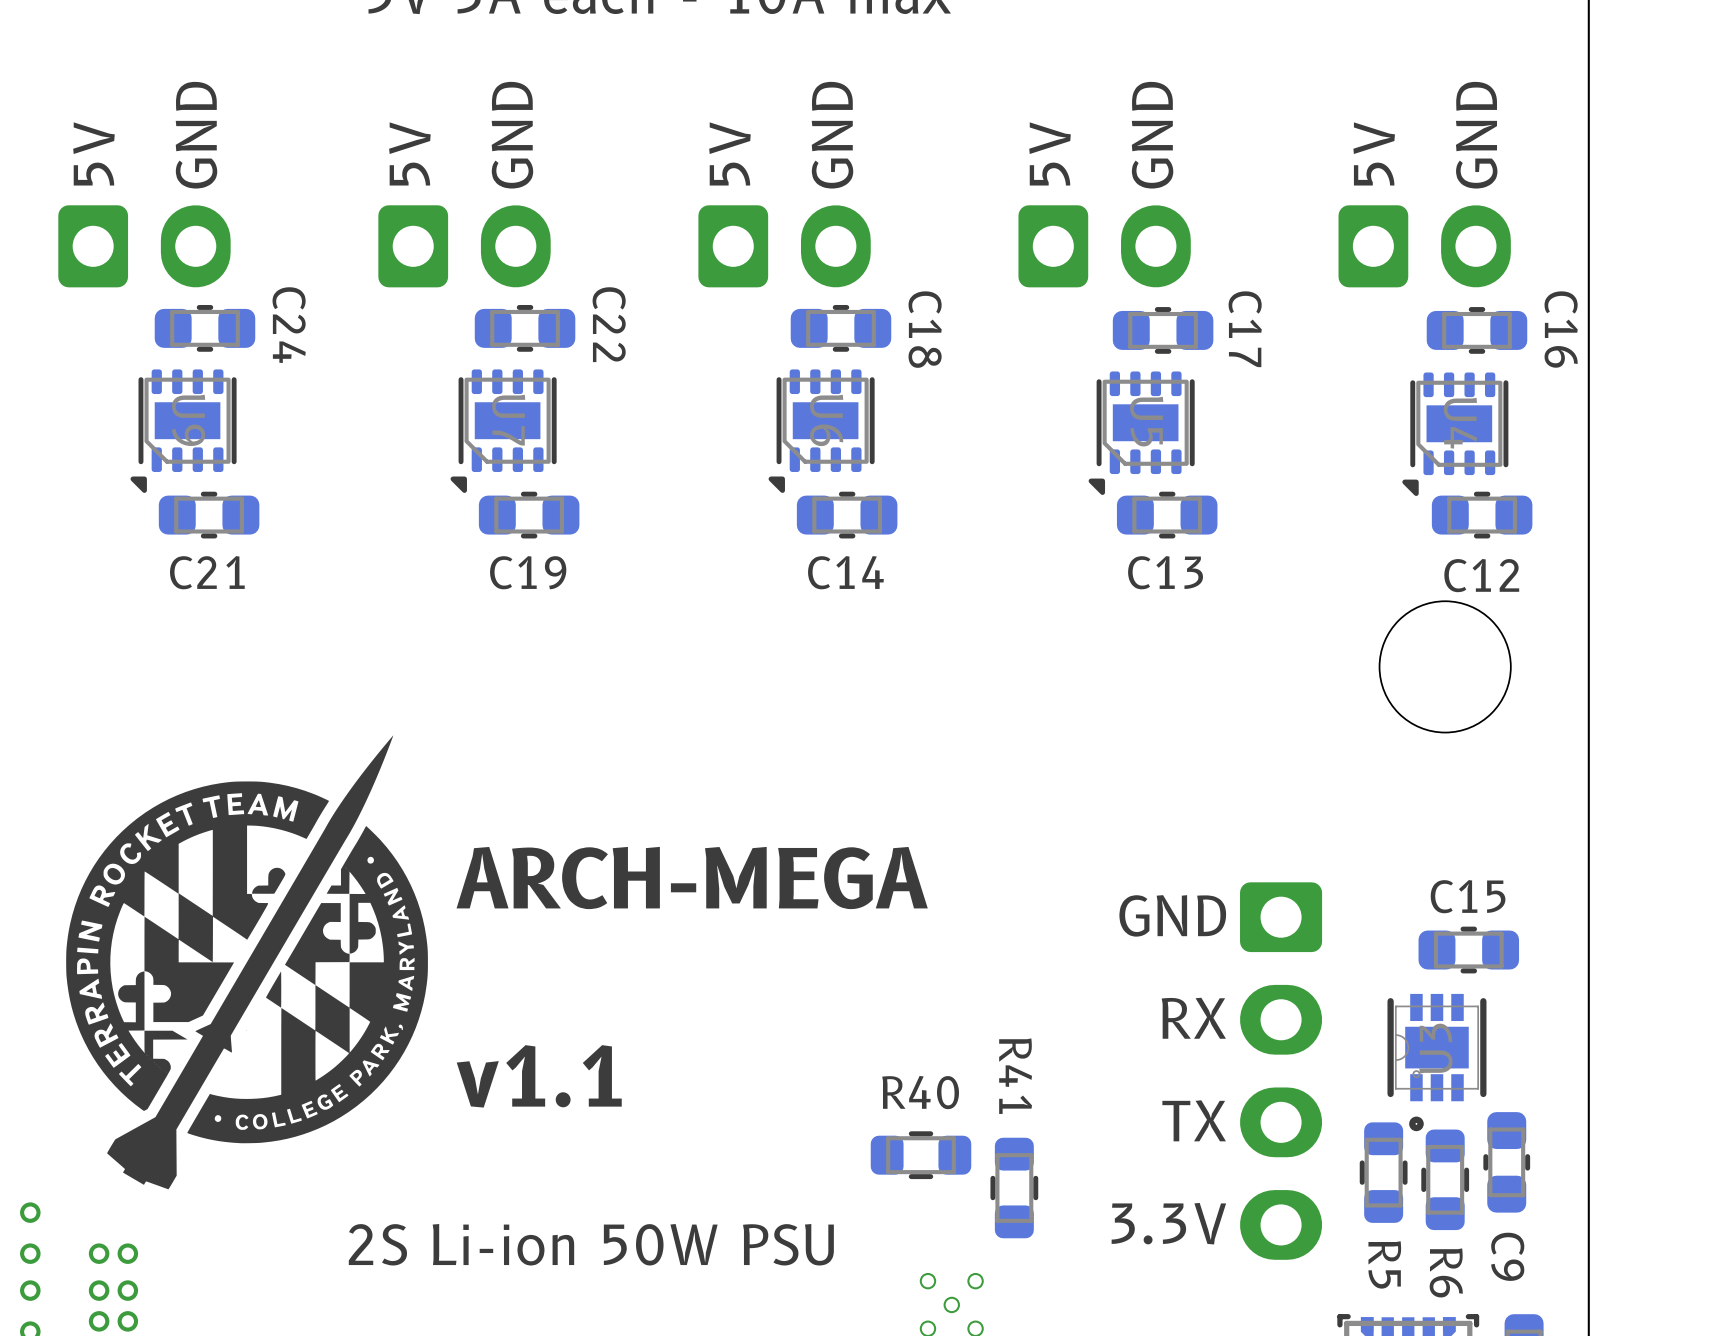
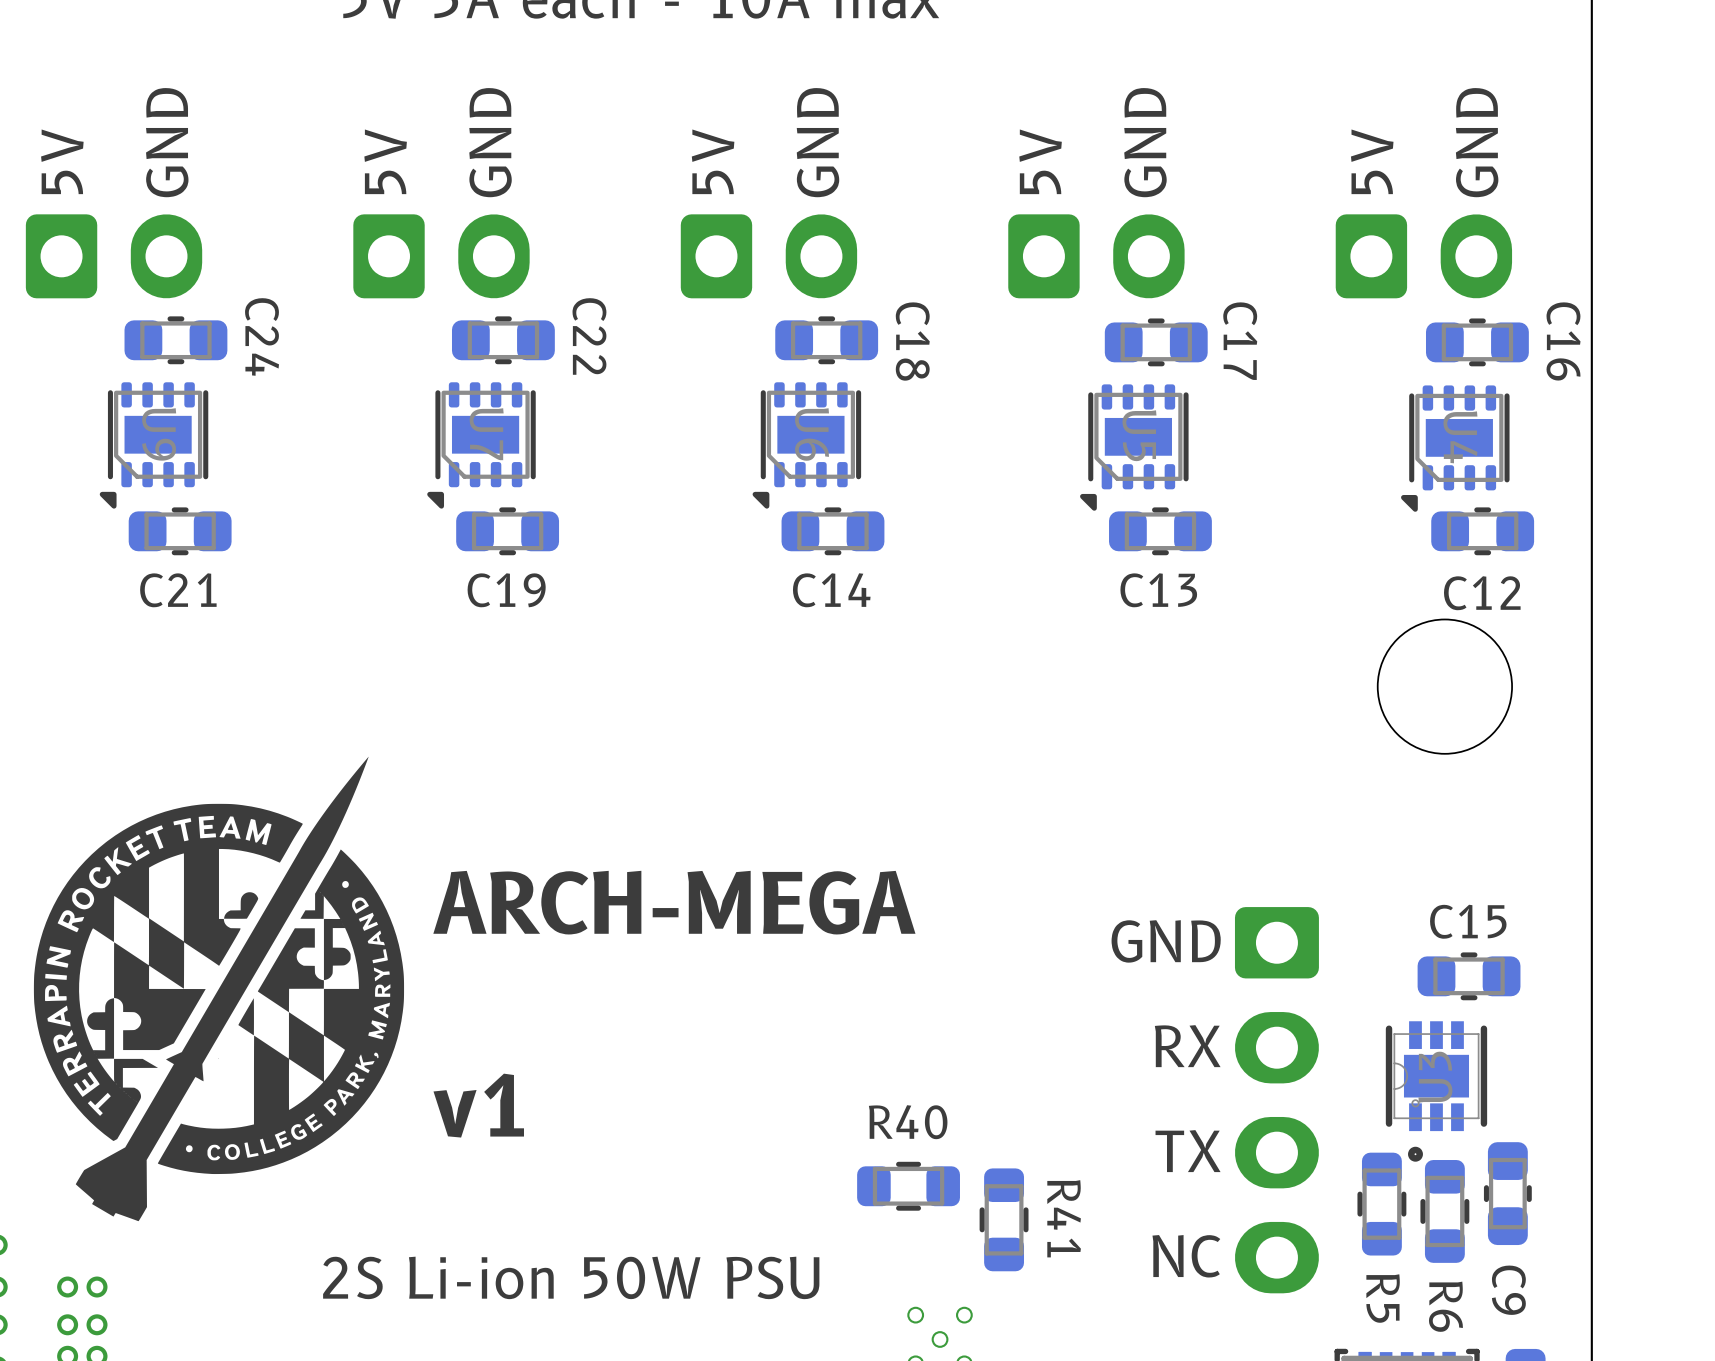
text: v1.1 (539, 1076) -> v1 (478, 1105)
R41 name position: R41 (1015, 1076) -> R41 (1064, 1218)
text: 3.3V (1168, 1223) -> NC (1186, 1256)

